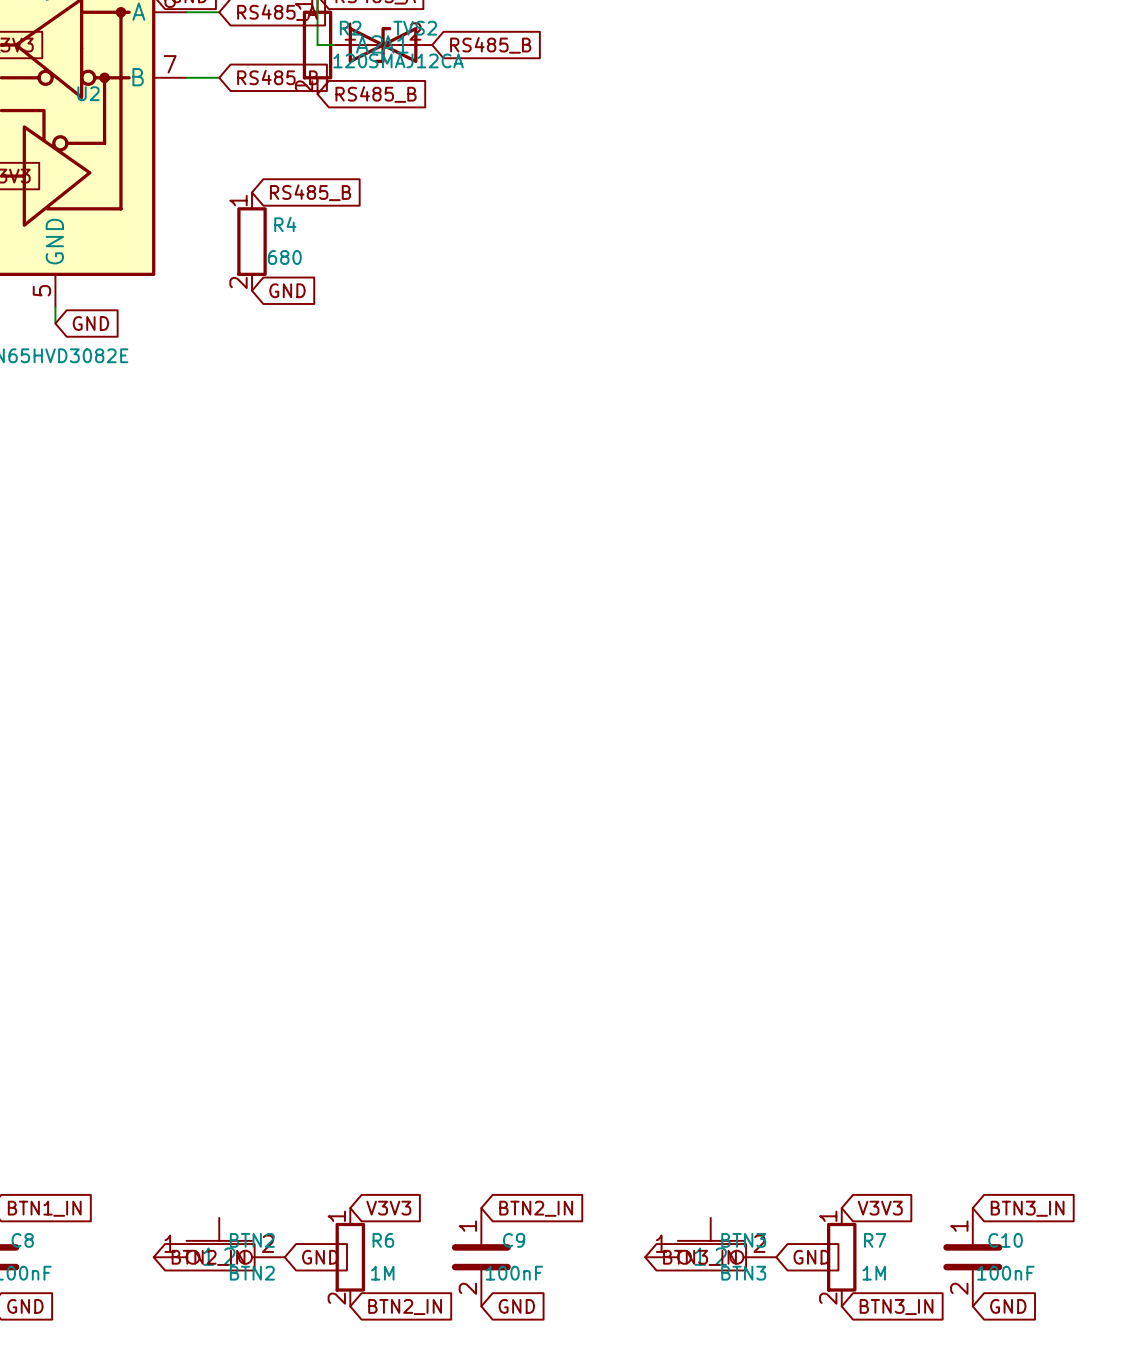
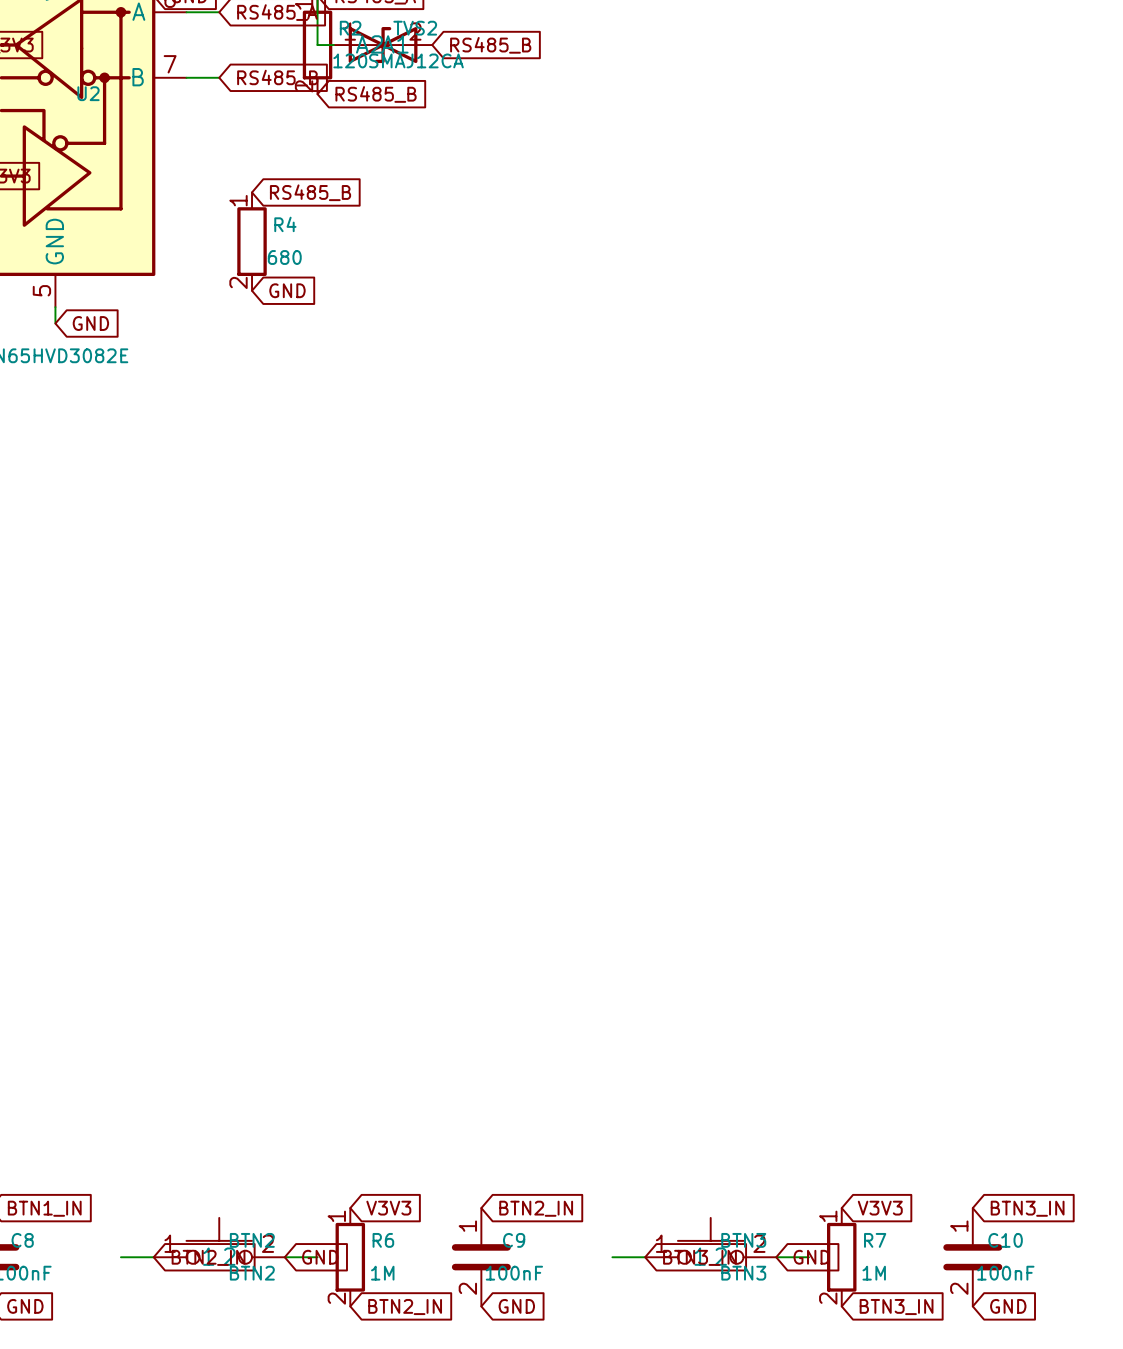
wire: none -> (120, 1257) (153, 1257)
wire: none -> (284, 1257) (317, 1257)
wire: none -> (612, 1257) (645, 1257)
wire: none -> (776, 1257) (808, 1257)

